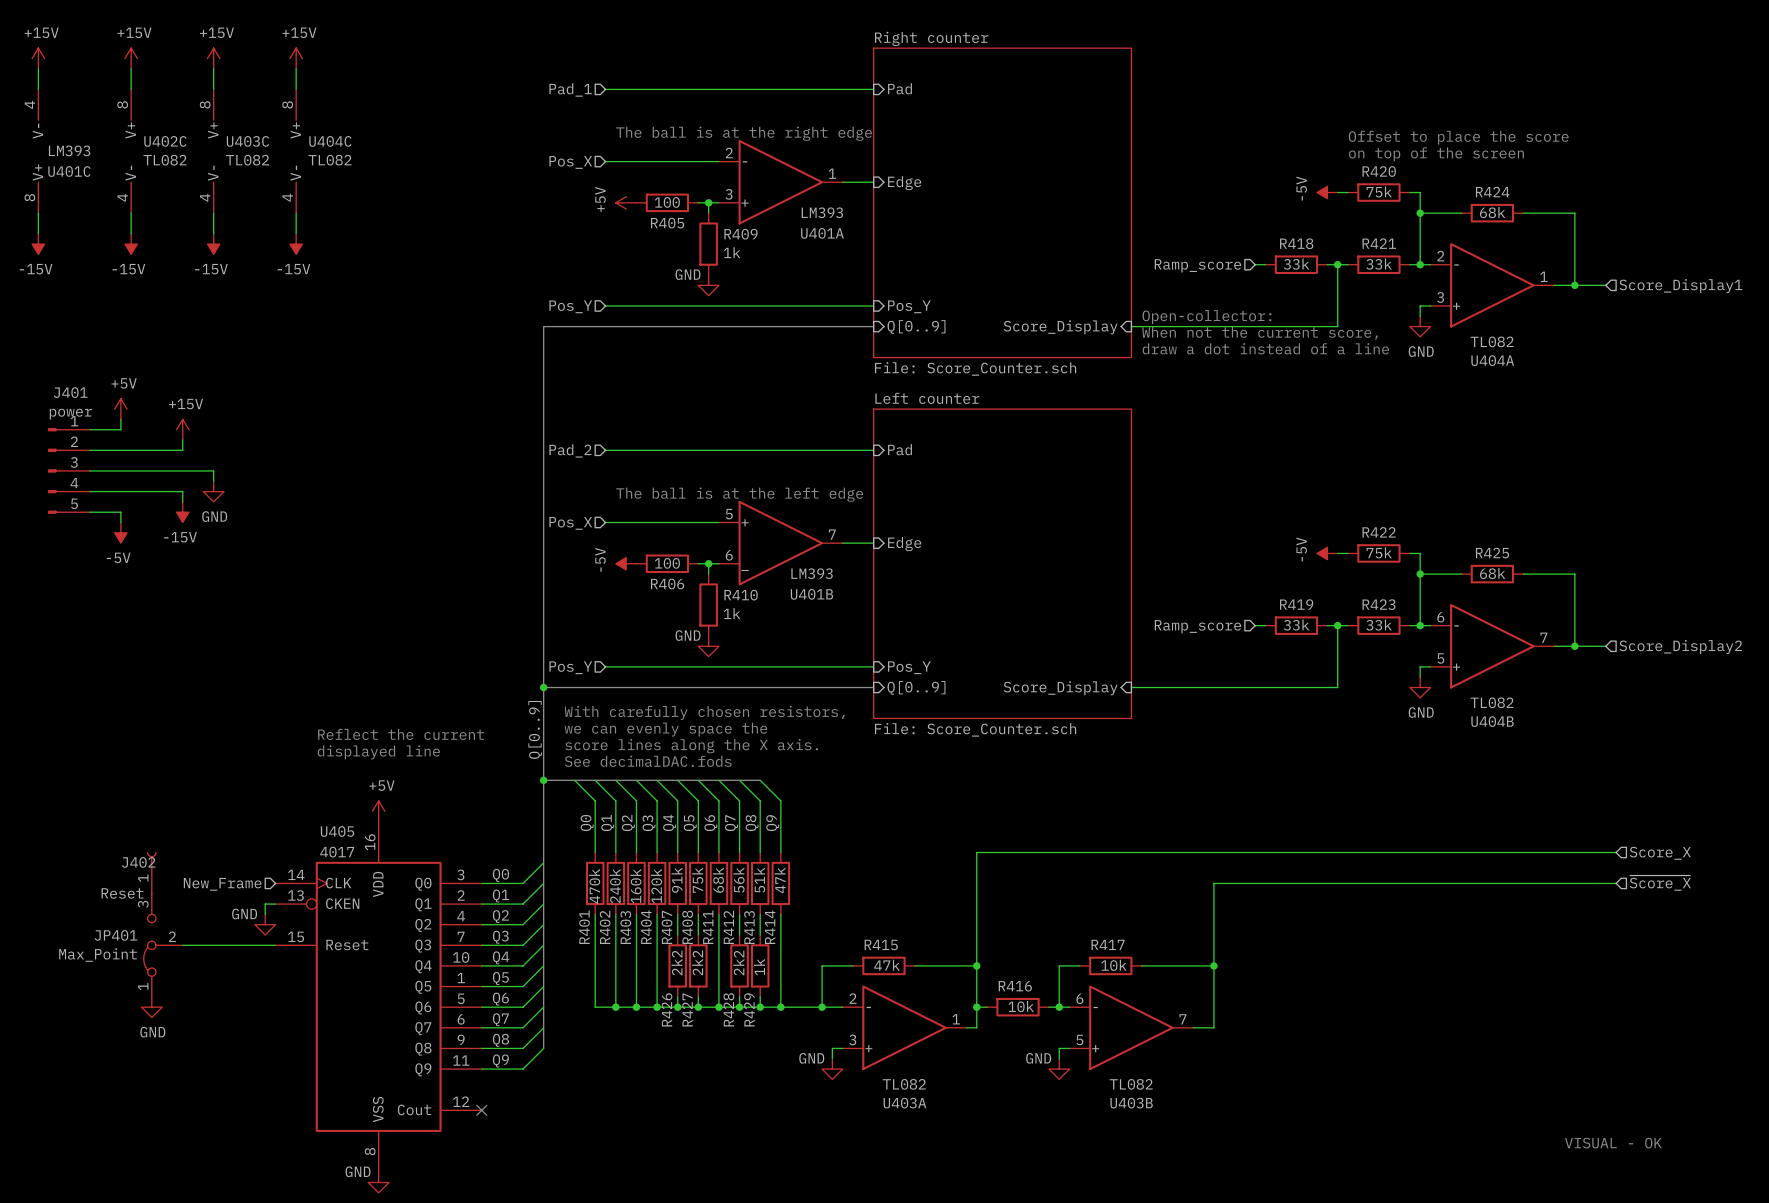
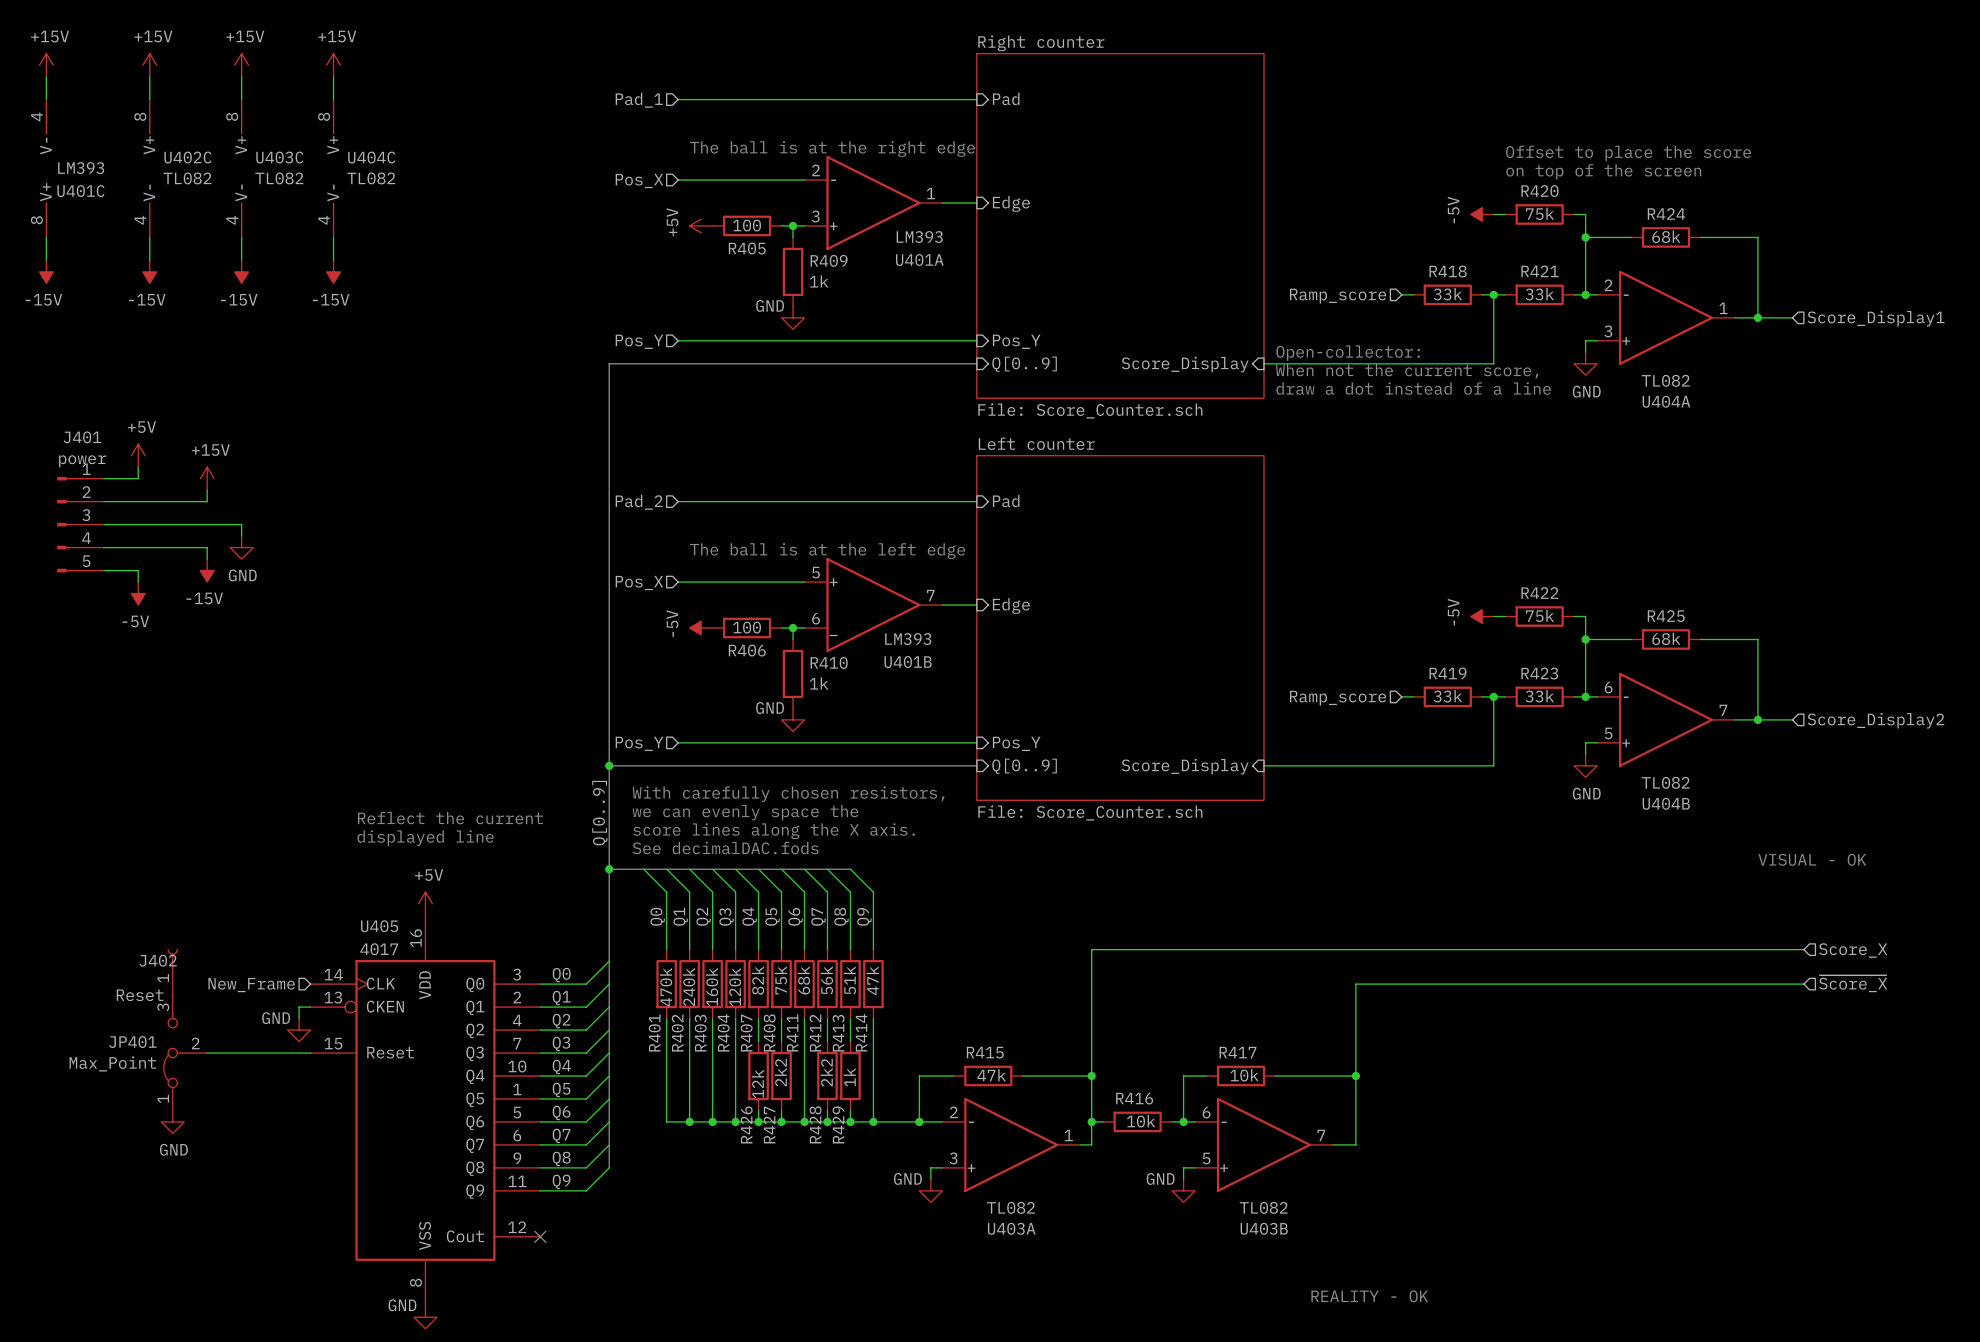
text: none -> VISUAL - OK (1812, 859)
R407 value: 91k (677, 880) -> 82k (757, 980)
R426 value: 2k2 (677, 962) -> 12k (757, 1083)
text: VISUAL - OK (1613, 1143) -> none
text: none -> REALITY - OK (1369, 1296)

